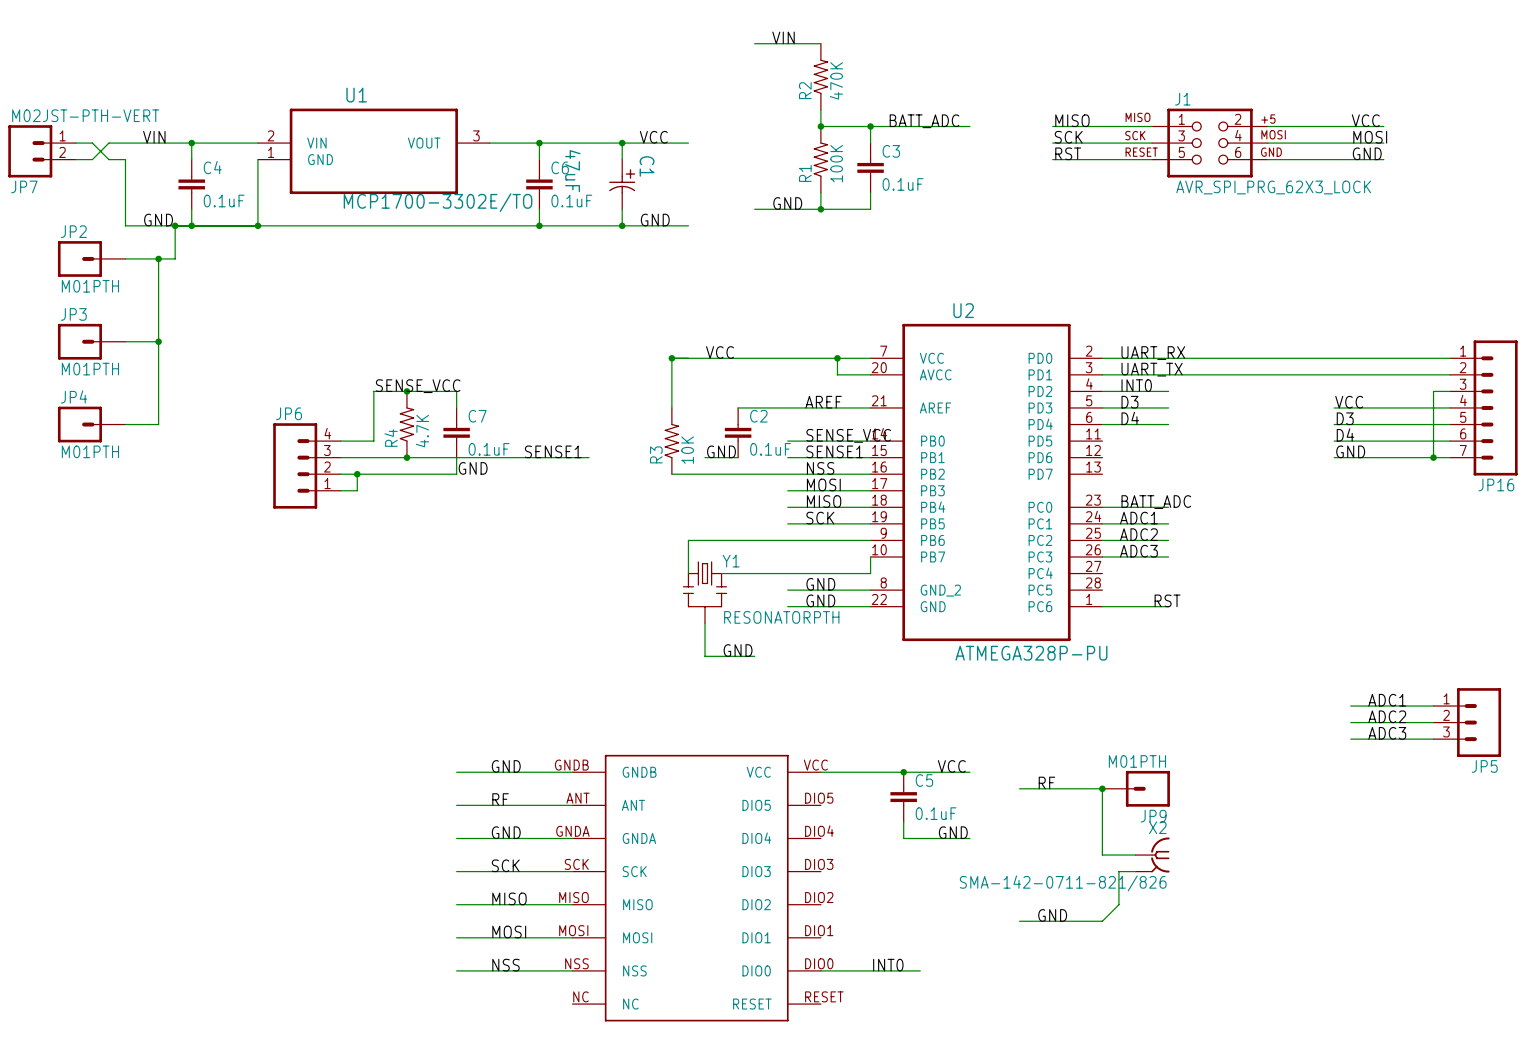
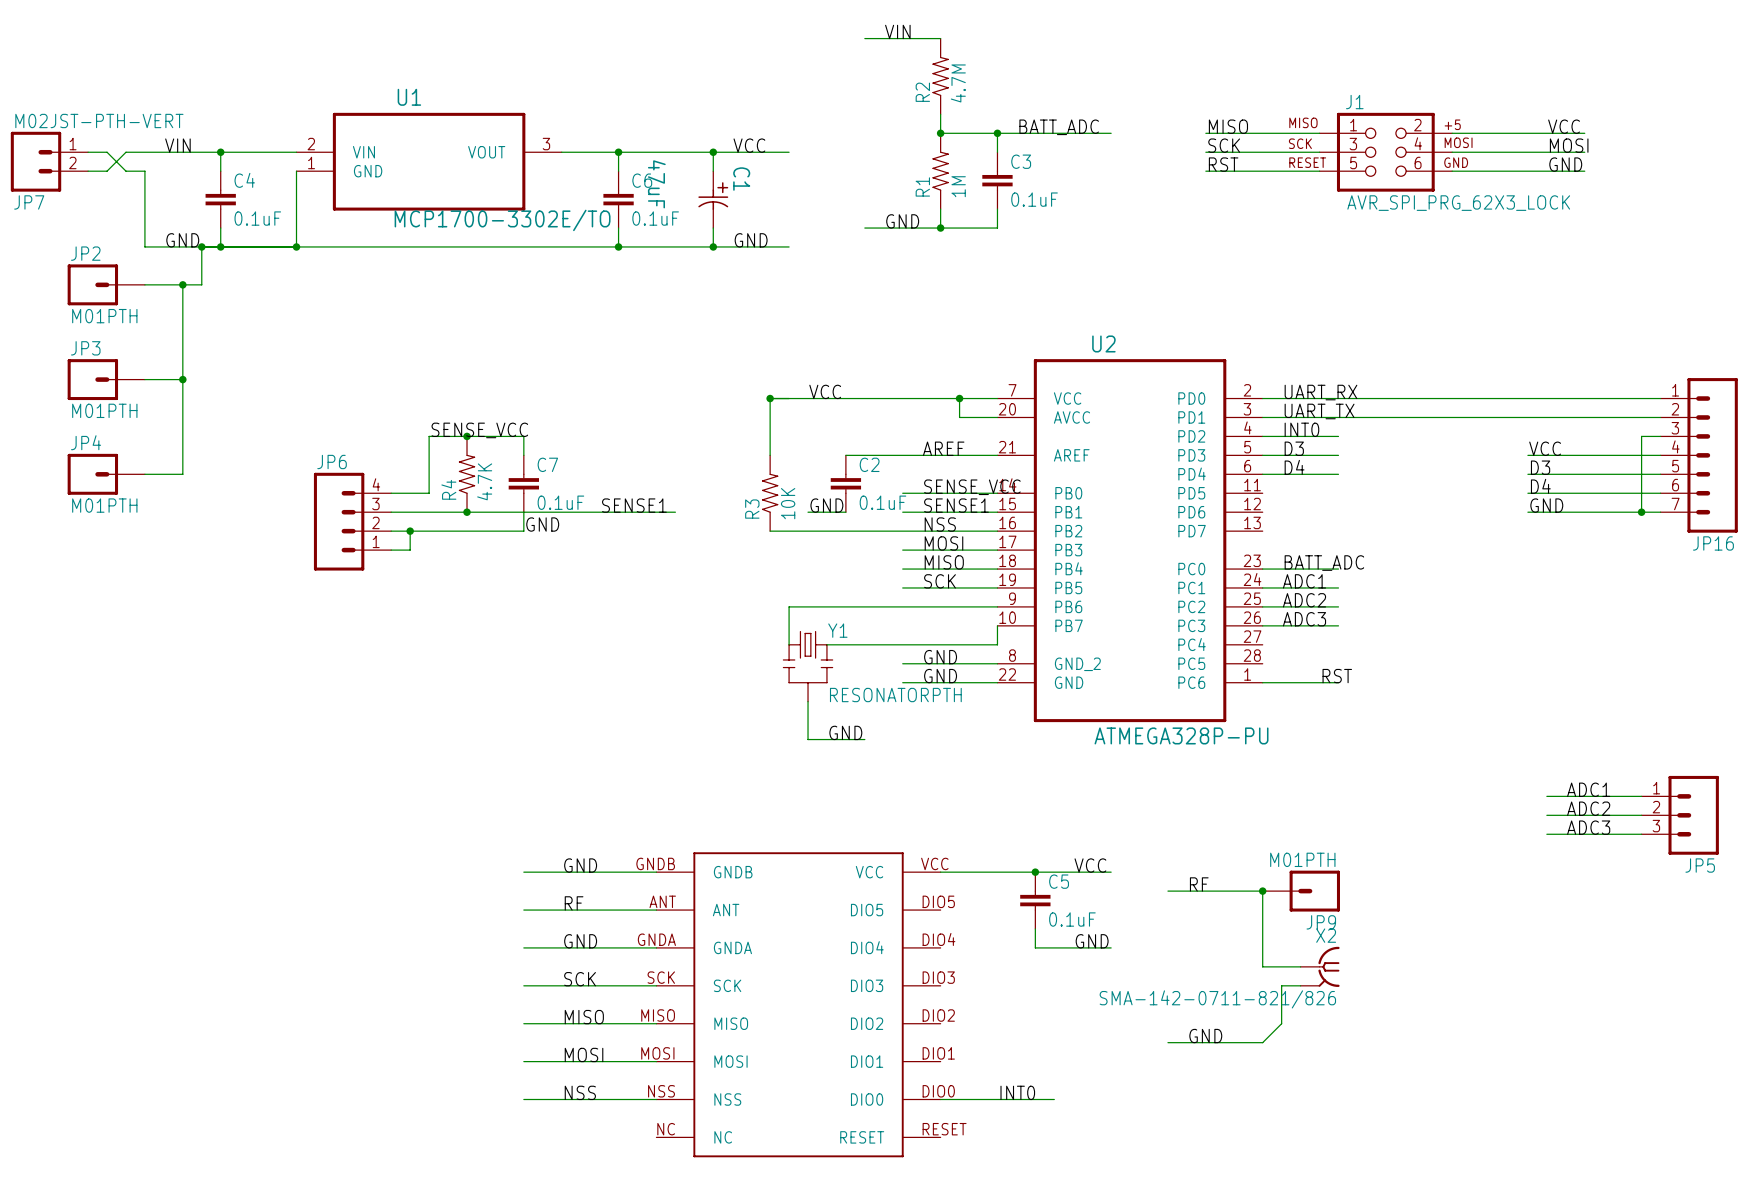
R2 value: 470K (836, 80) -> 4.7M (958, 83)
R1 value: 100K (836, 163) -> 1M (958, 186)

